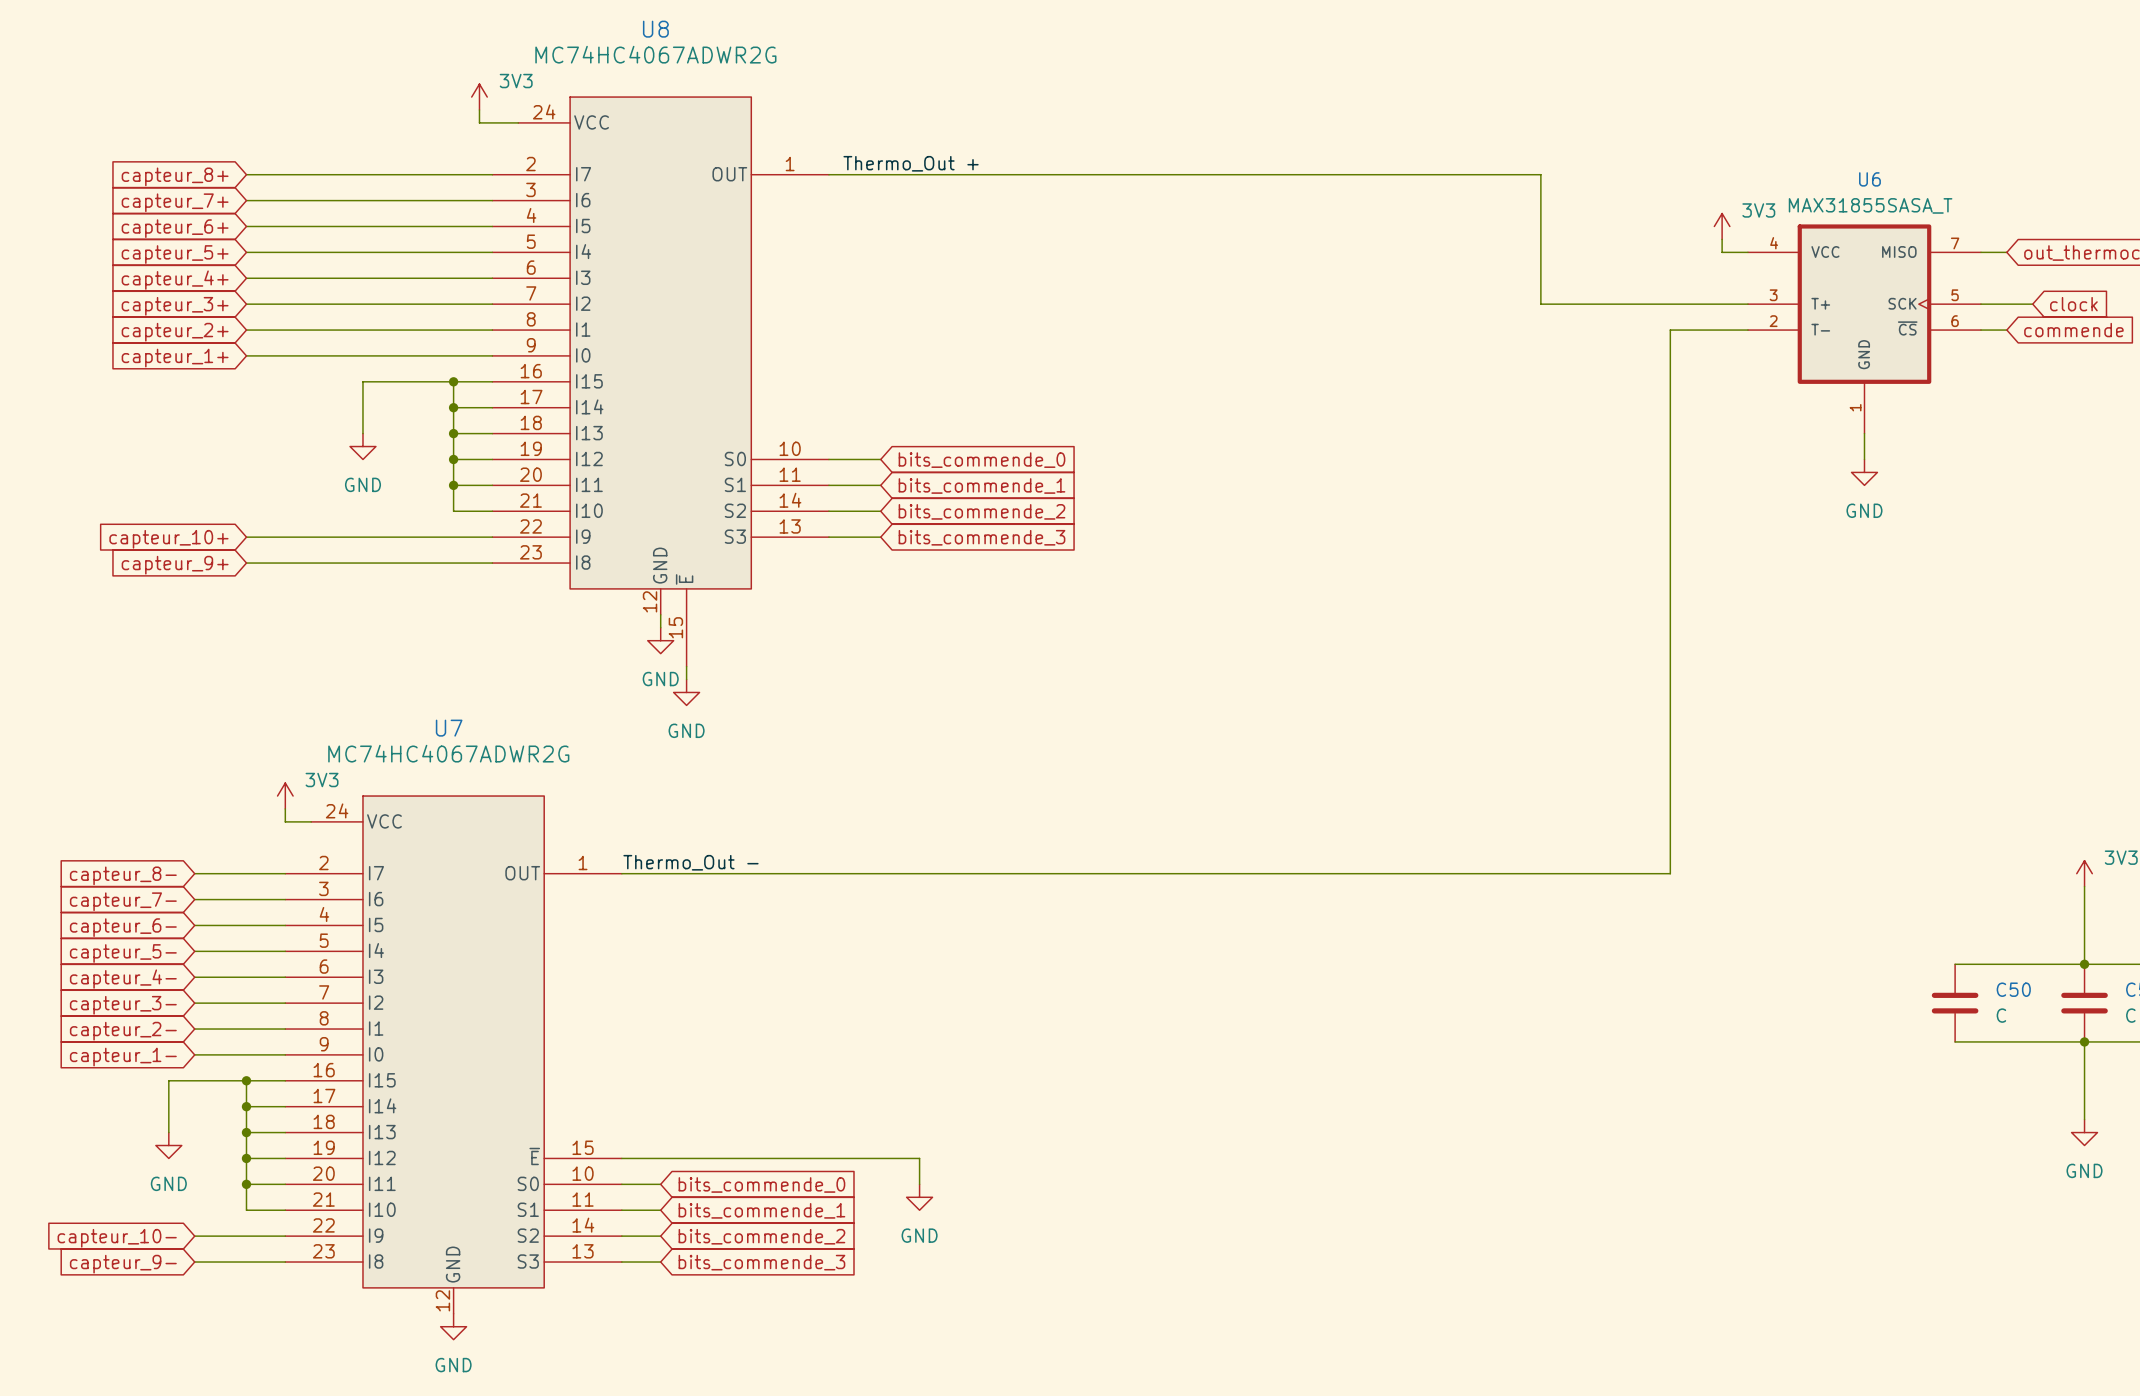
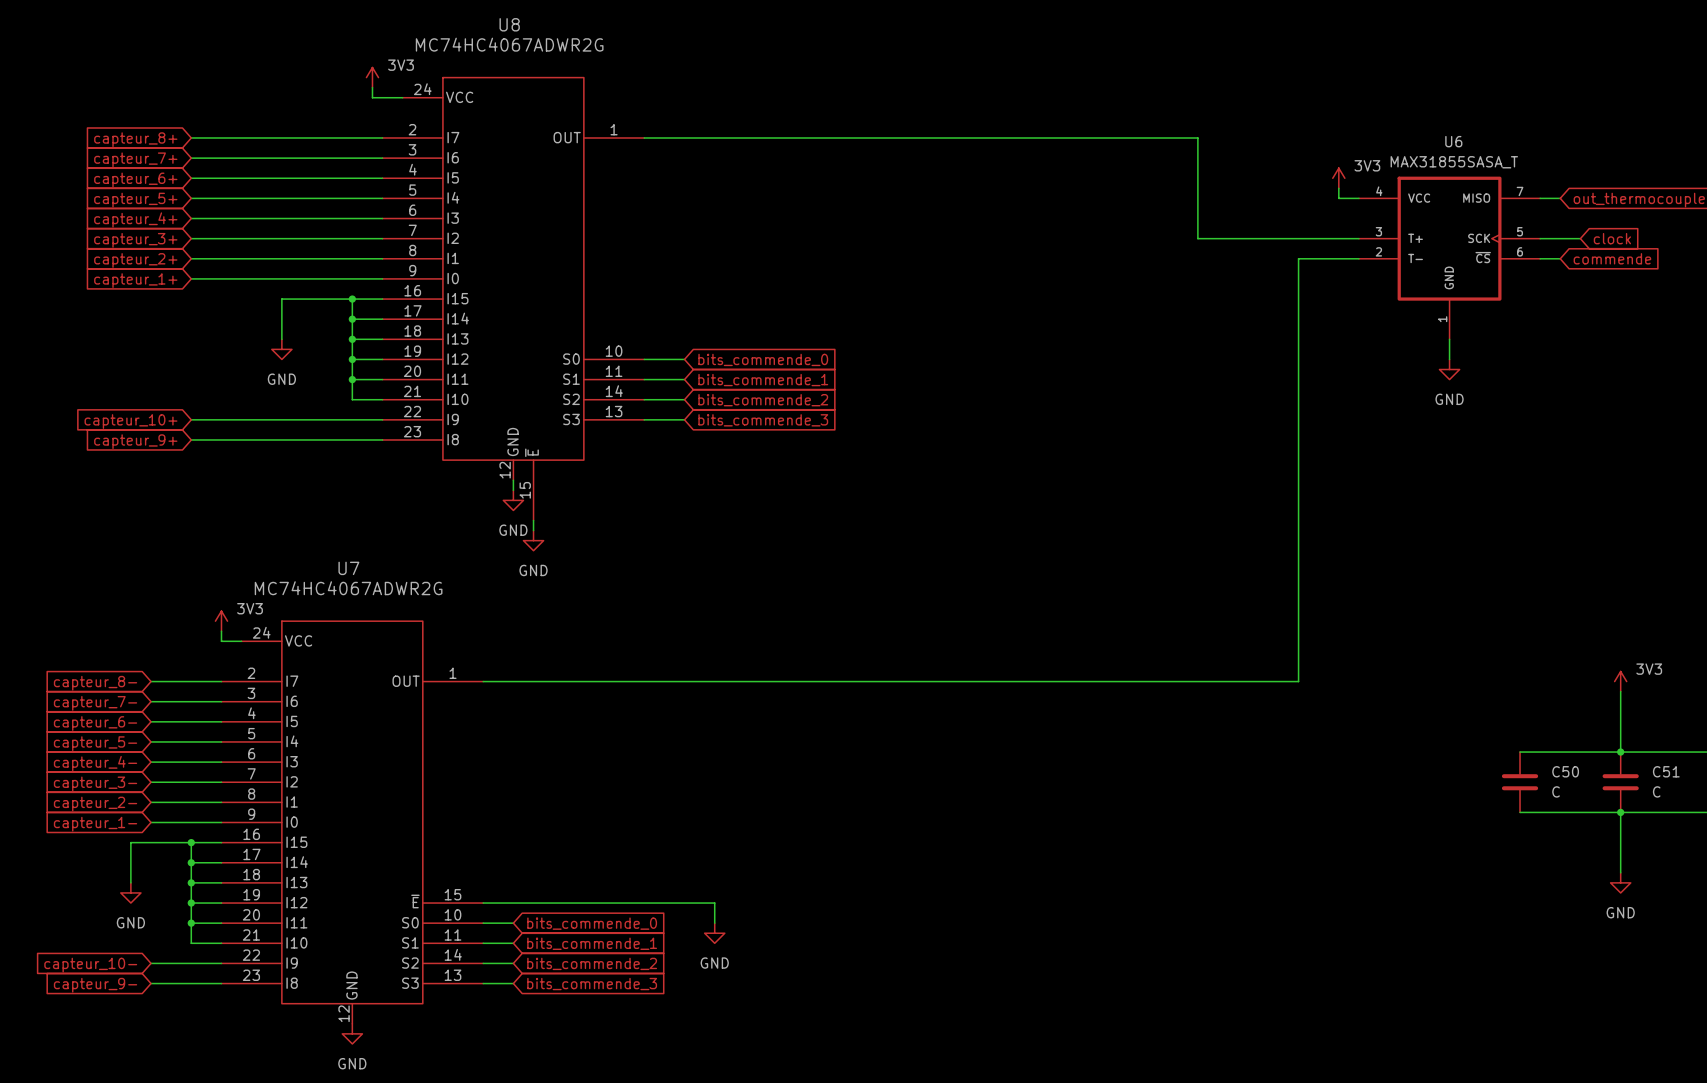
label: Thermo_Out + (911, 163) -> none
label: Thermo_Out - (690, 862) -> none

